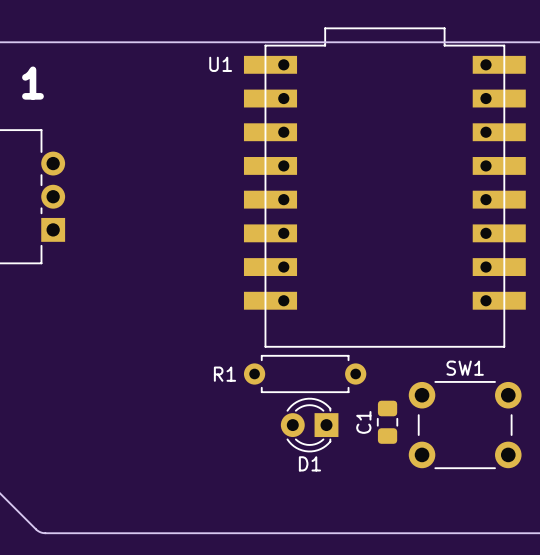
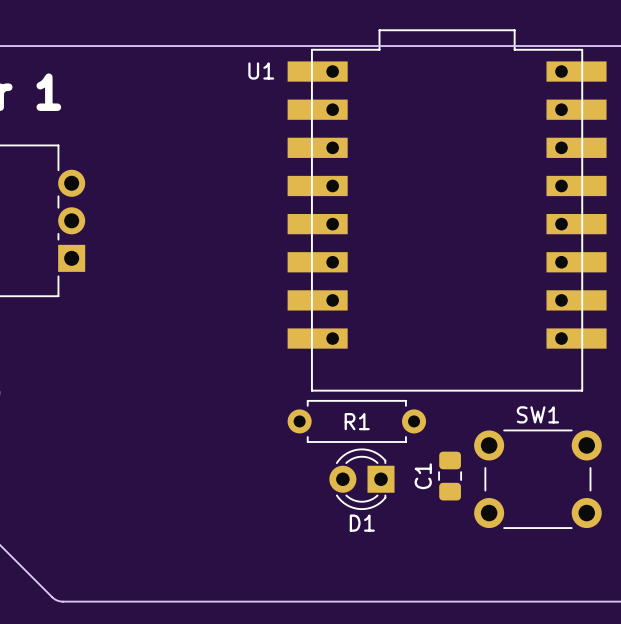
R1 name position: R1 (224, 374) -> R1 (357, 421)

